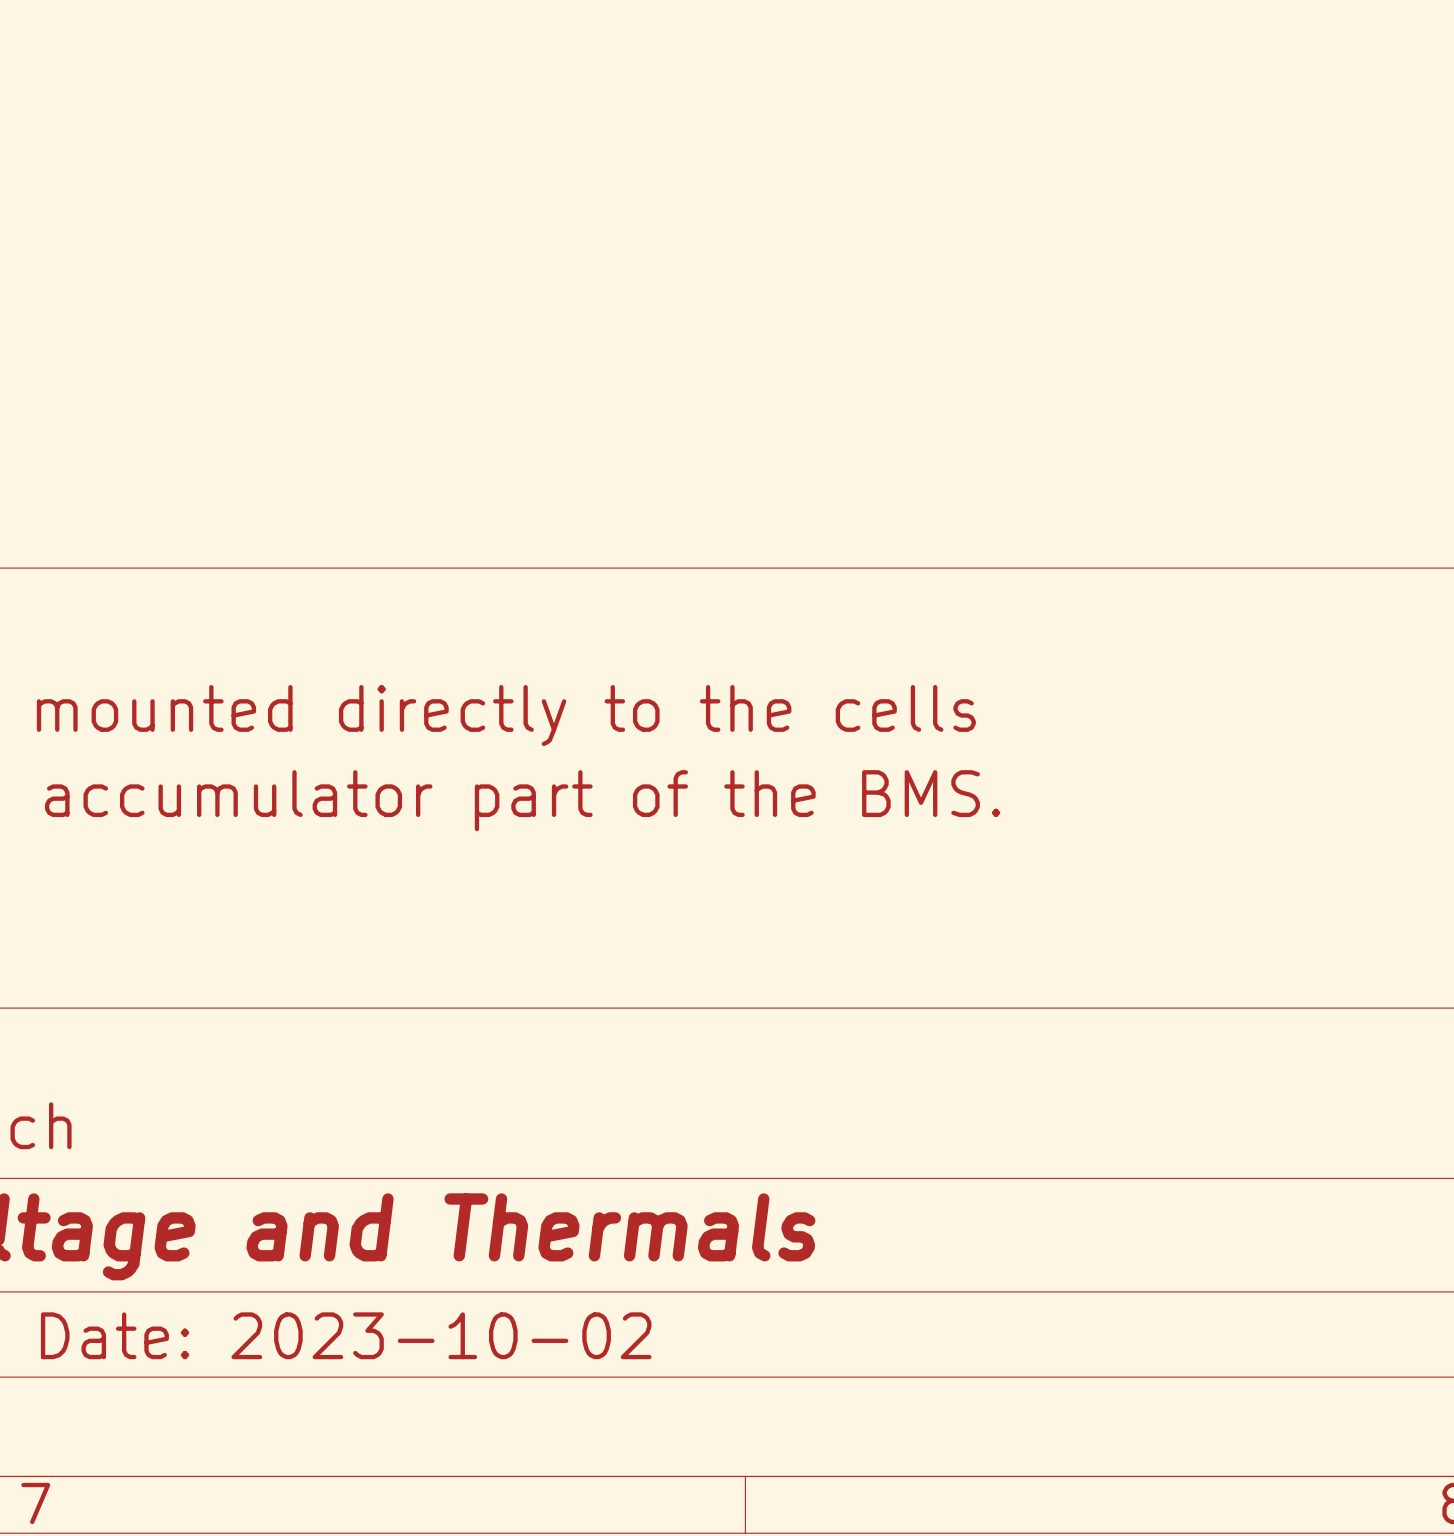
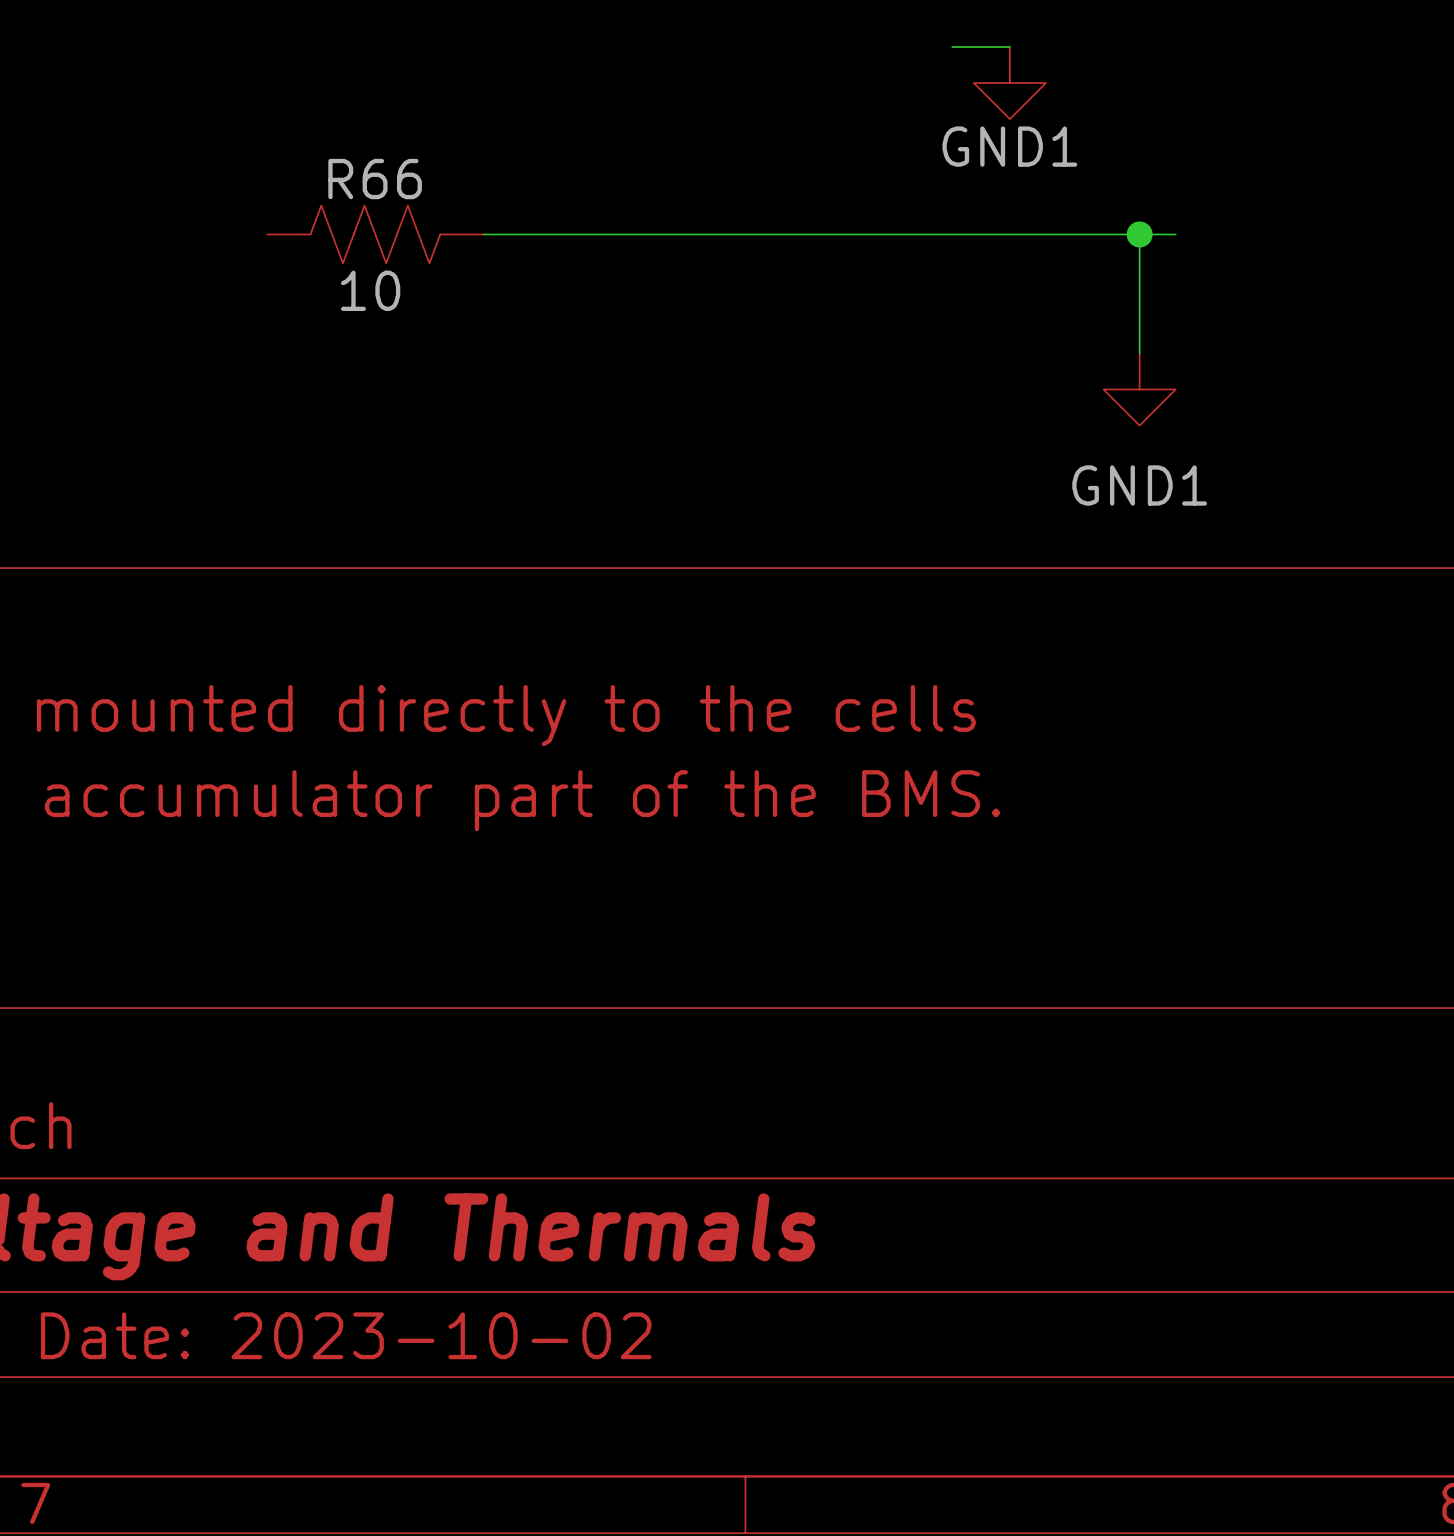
wire: none -> (952, 47) (1009, 47)
power symbol: none -> GND1 (1009, 83)
R66: none -> 10 (375, 234)
wire: none -> (483, 234) (1175, 234)
wire: none -> (1139, 234) (1139, 353)
junction: none -> (1139, 234)
power symbol: none -> GND1 (1139, 389)

